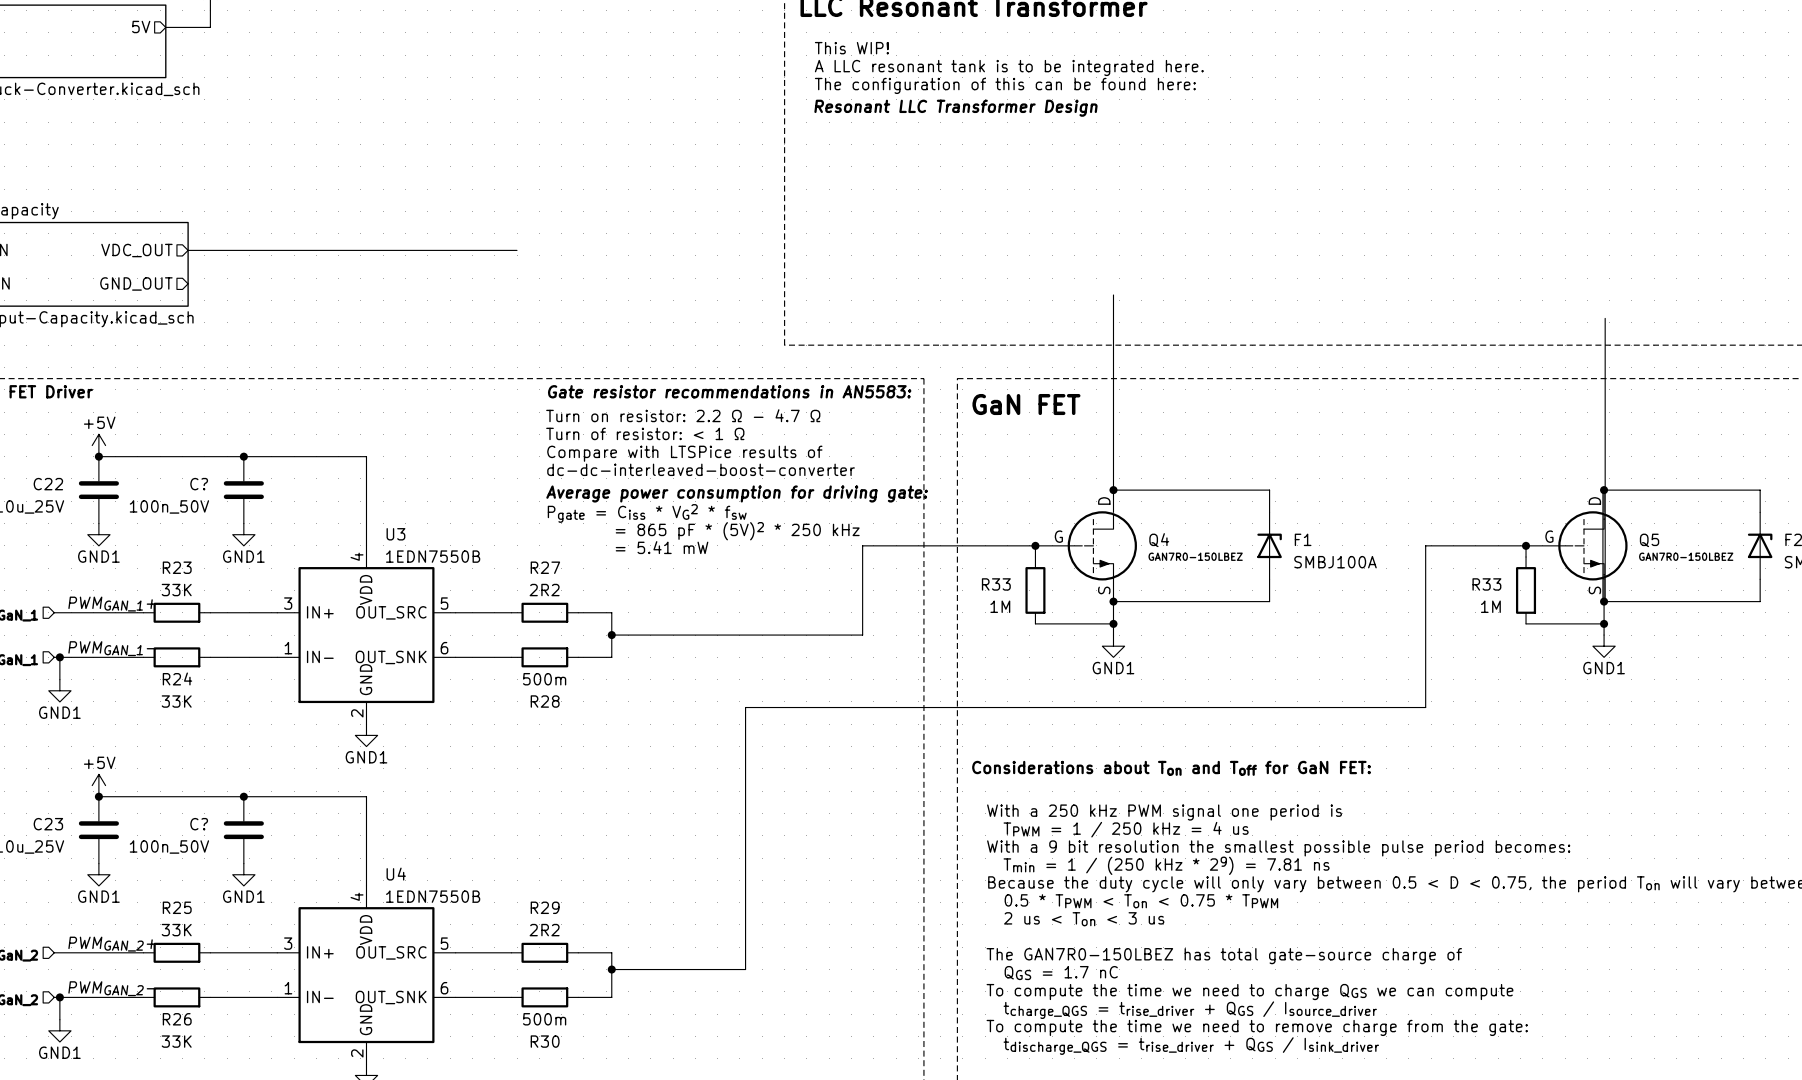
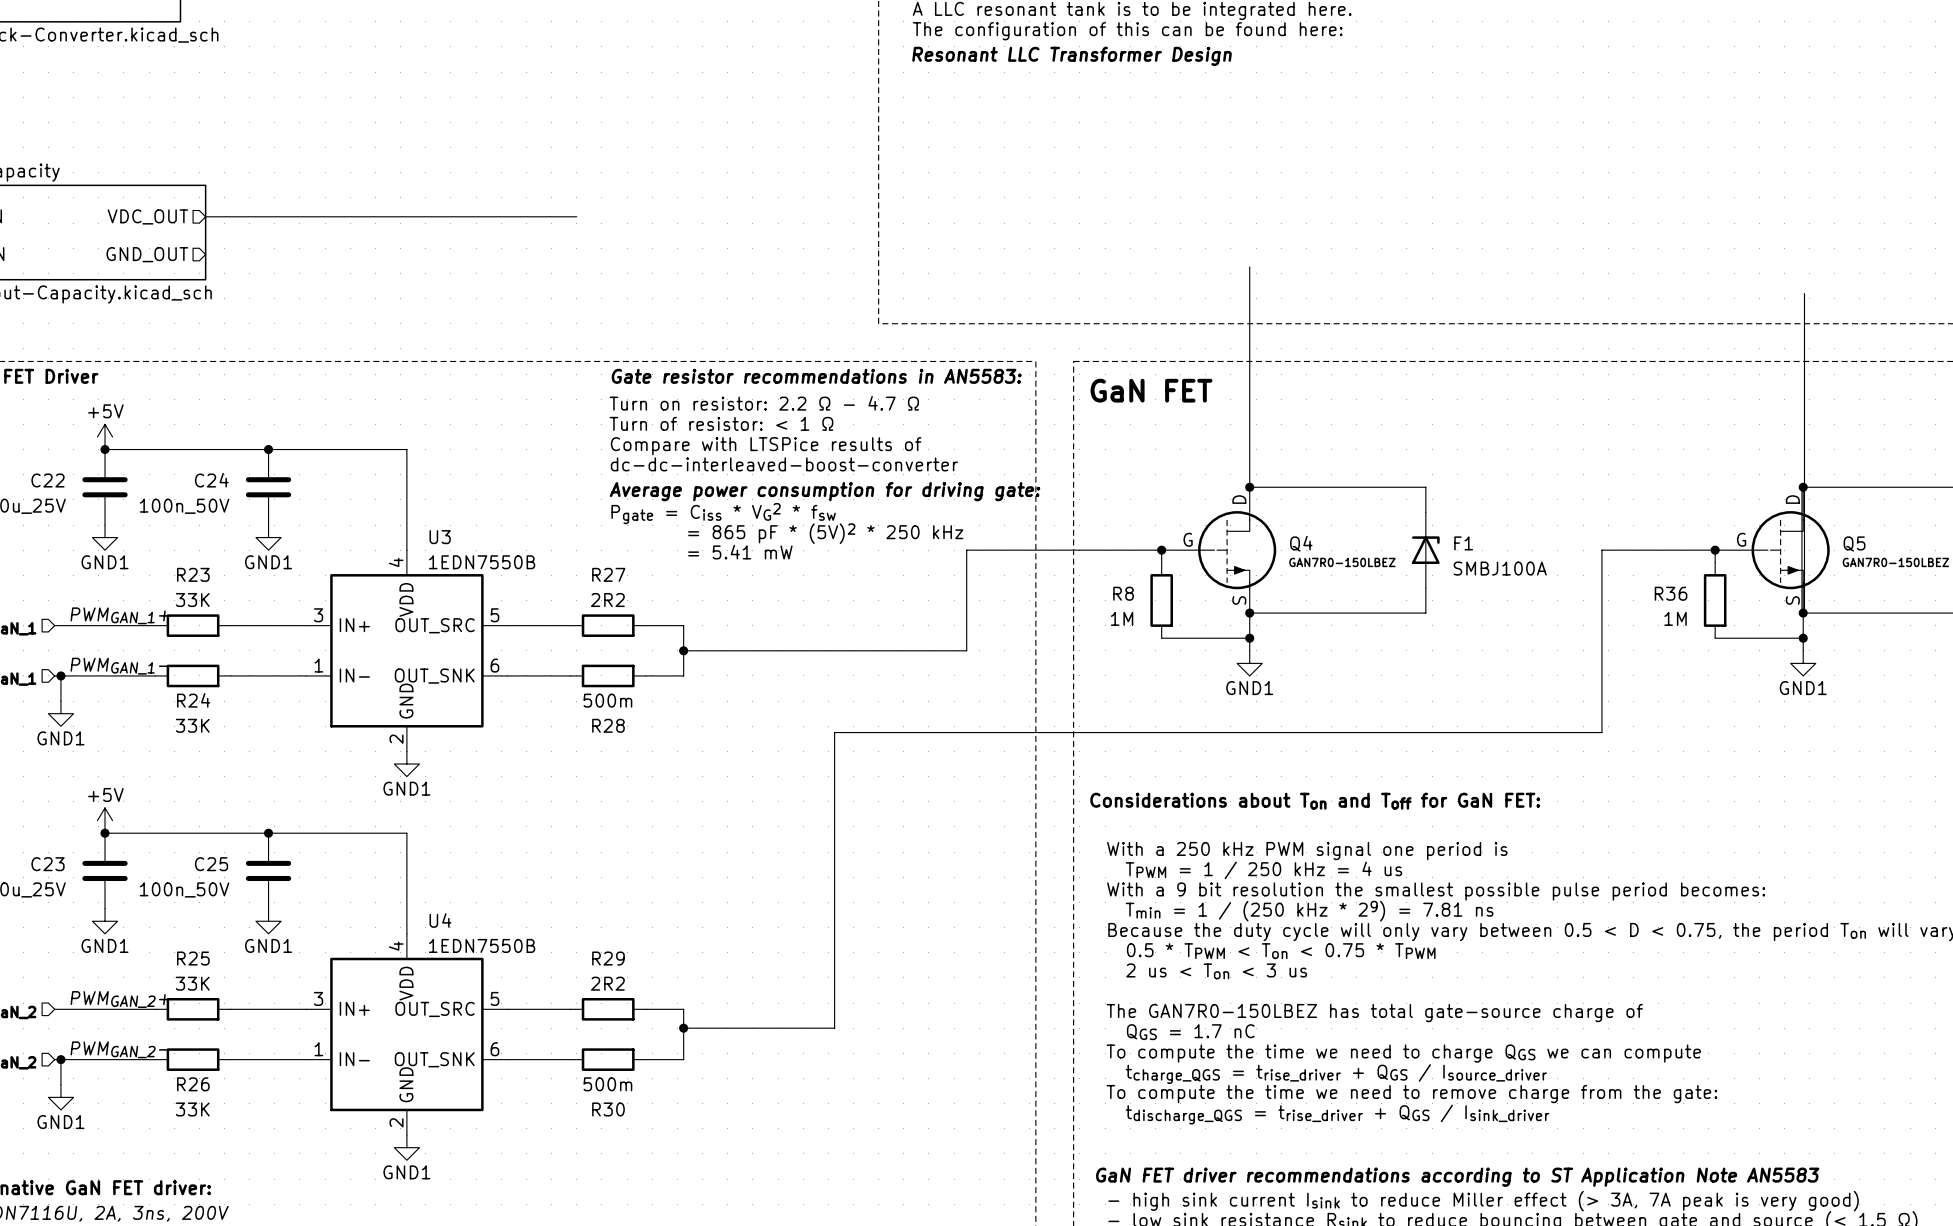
C? name: C? (199, 484) -> C24 (211, 480)
R33 name: R33 (996, 584) -> R8 (1123, 593)
R33 name: R33 (1486, 584) -> R36 (1671, 593)
C? name: C? (199, 824) -> C25 (211, 864)

